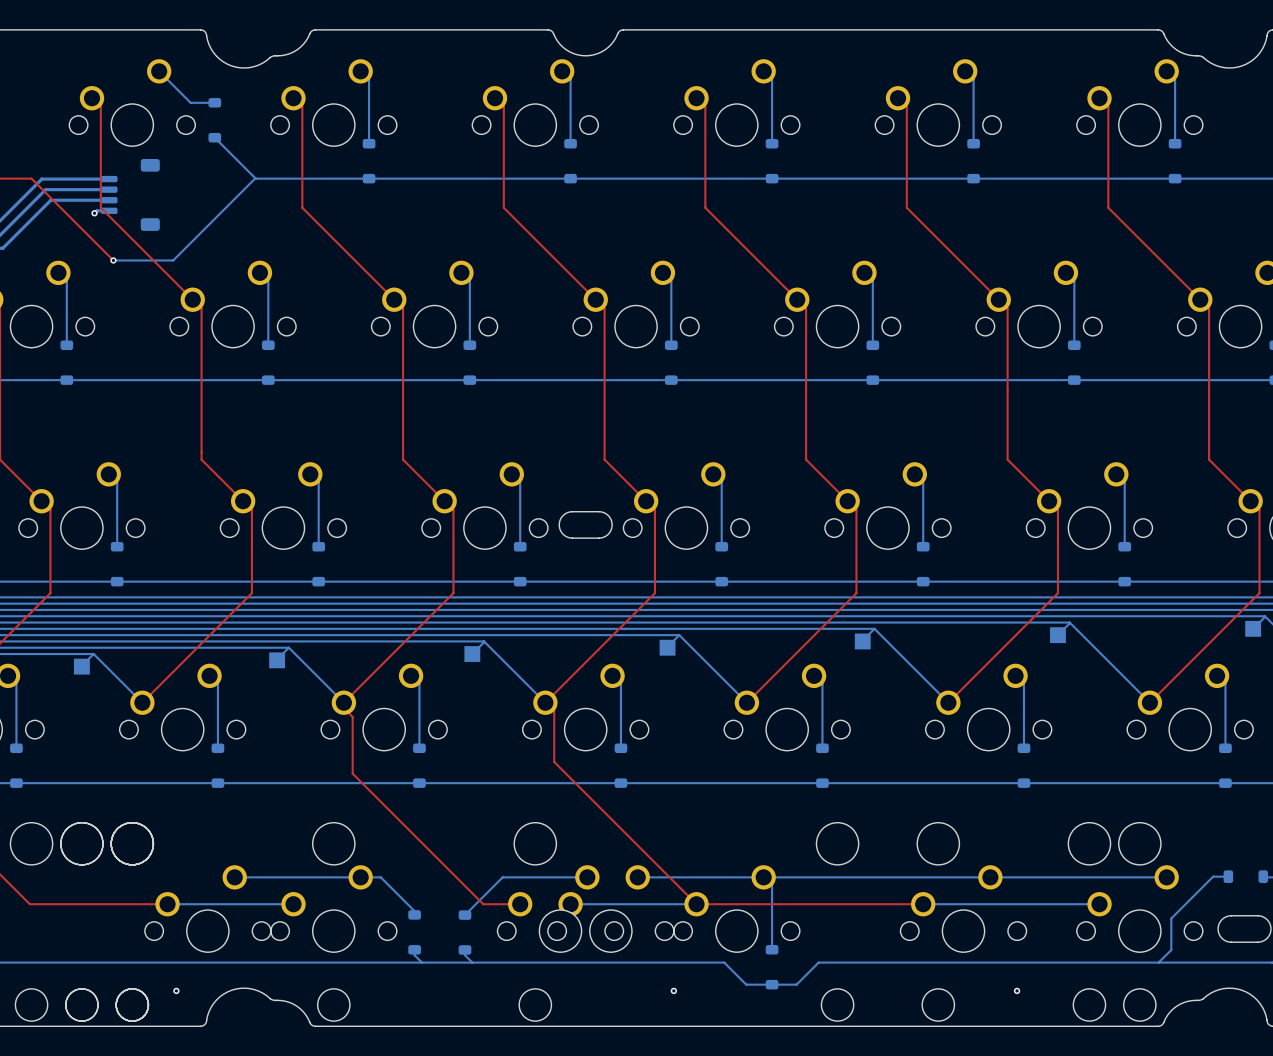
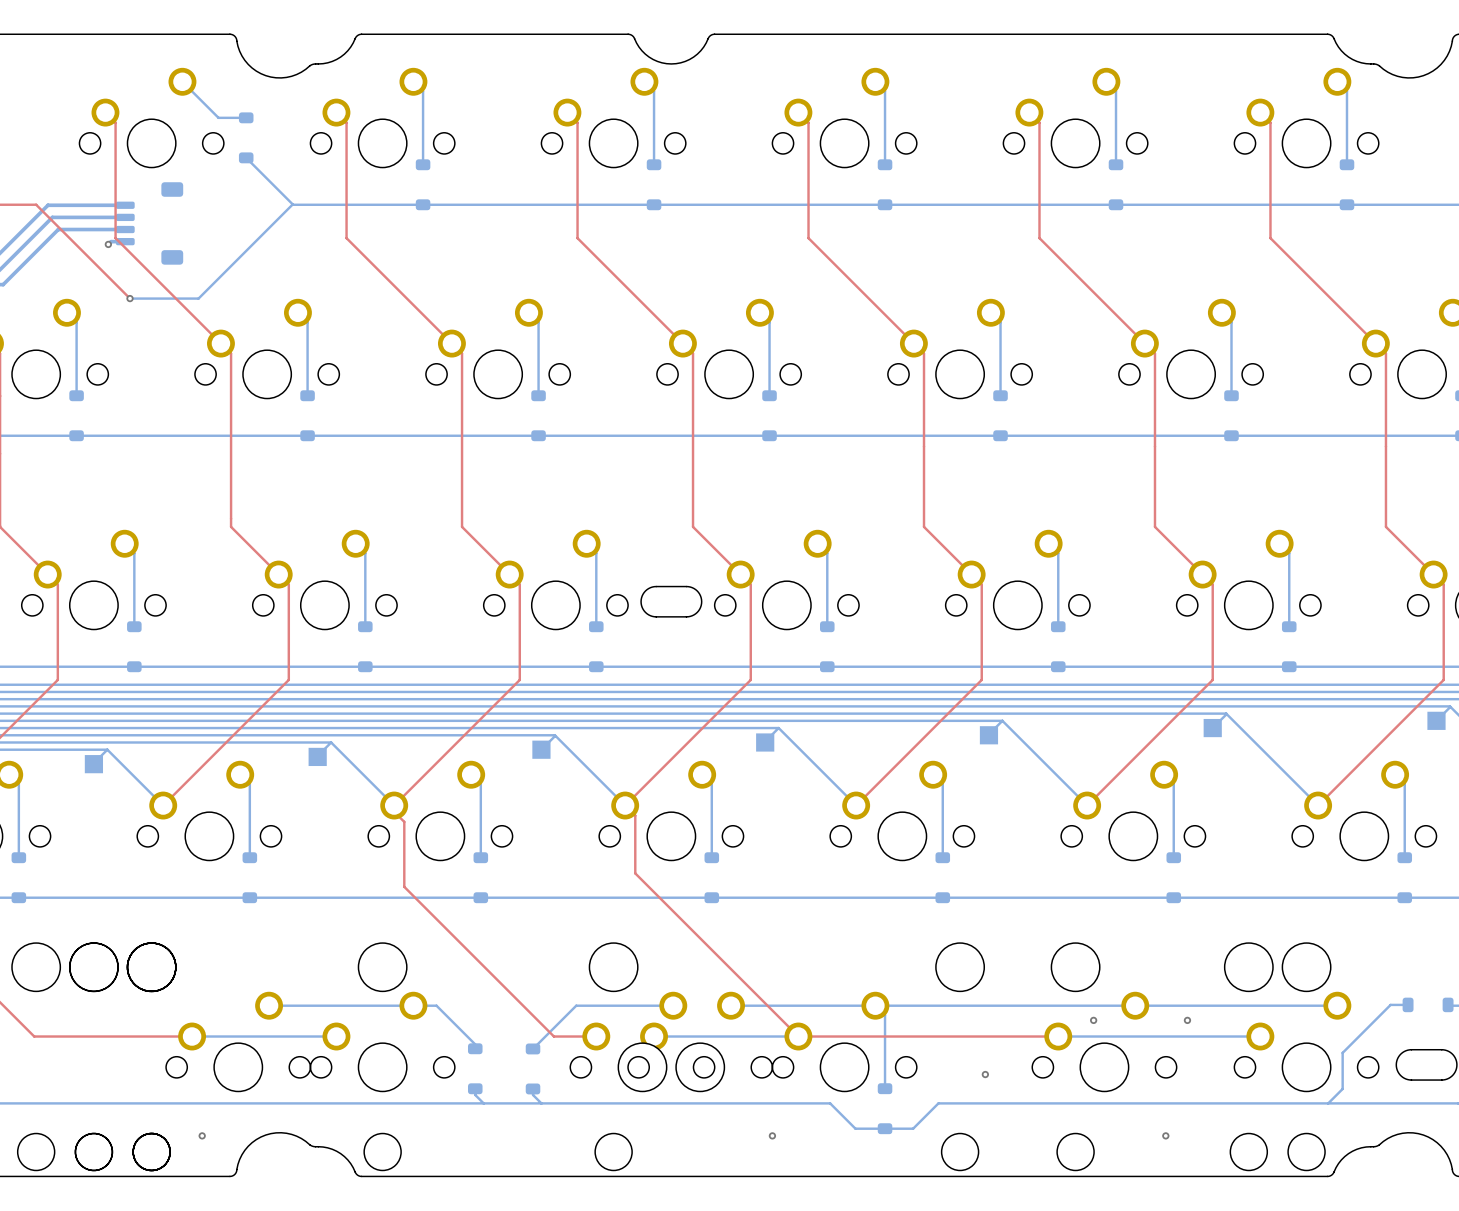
via: none -> (1093, 1020)
via: none -> (1187, 1020)
via: none -> (985, 1074)

